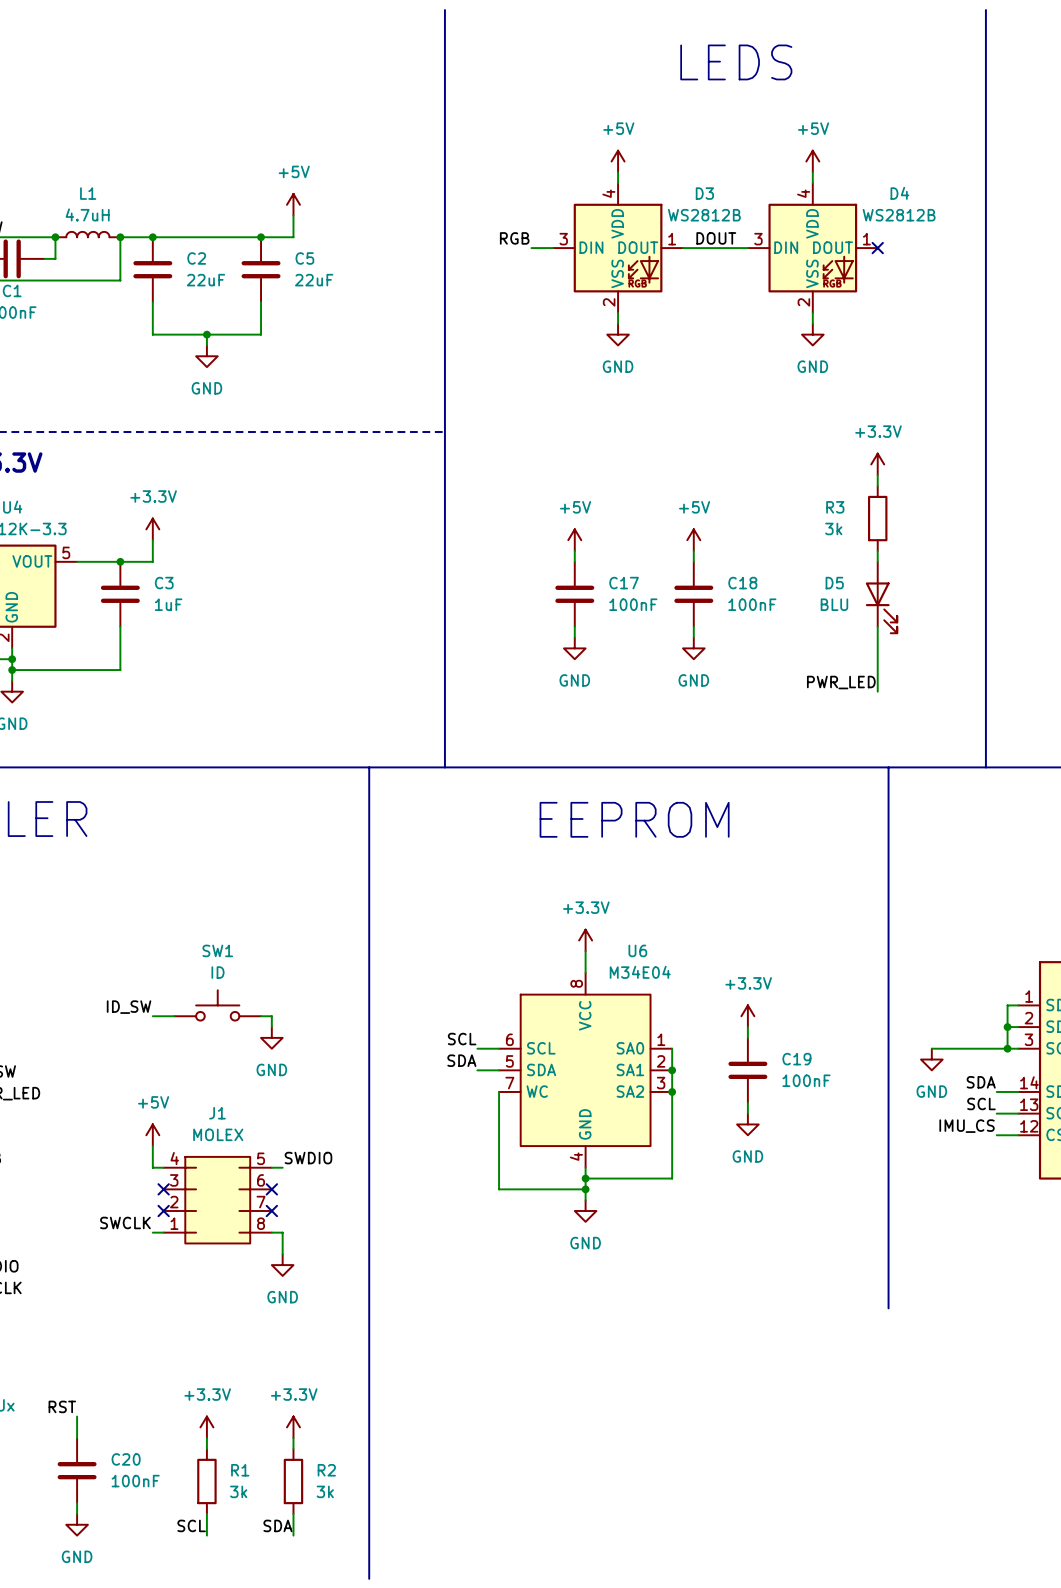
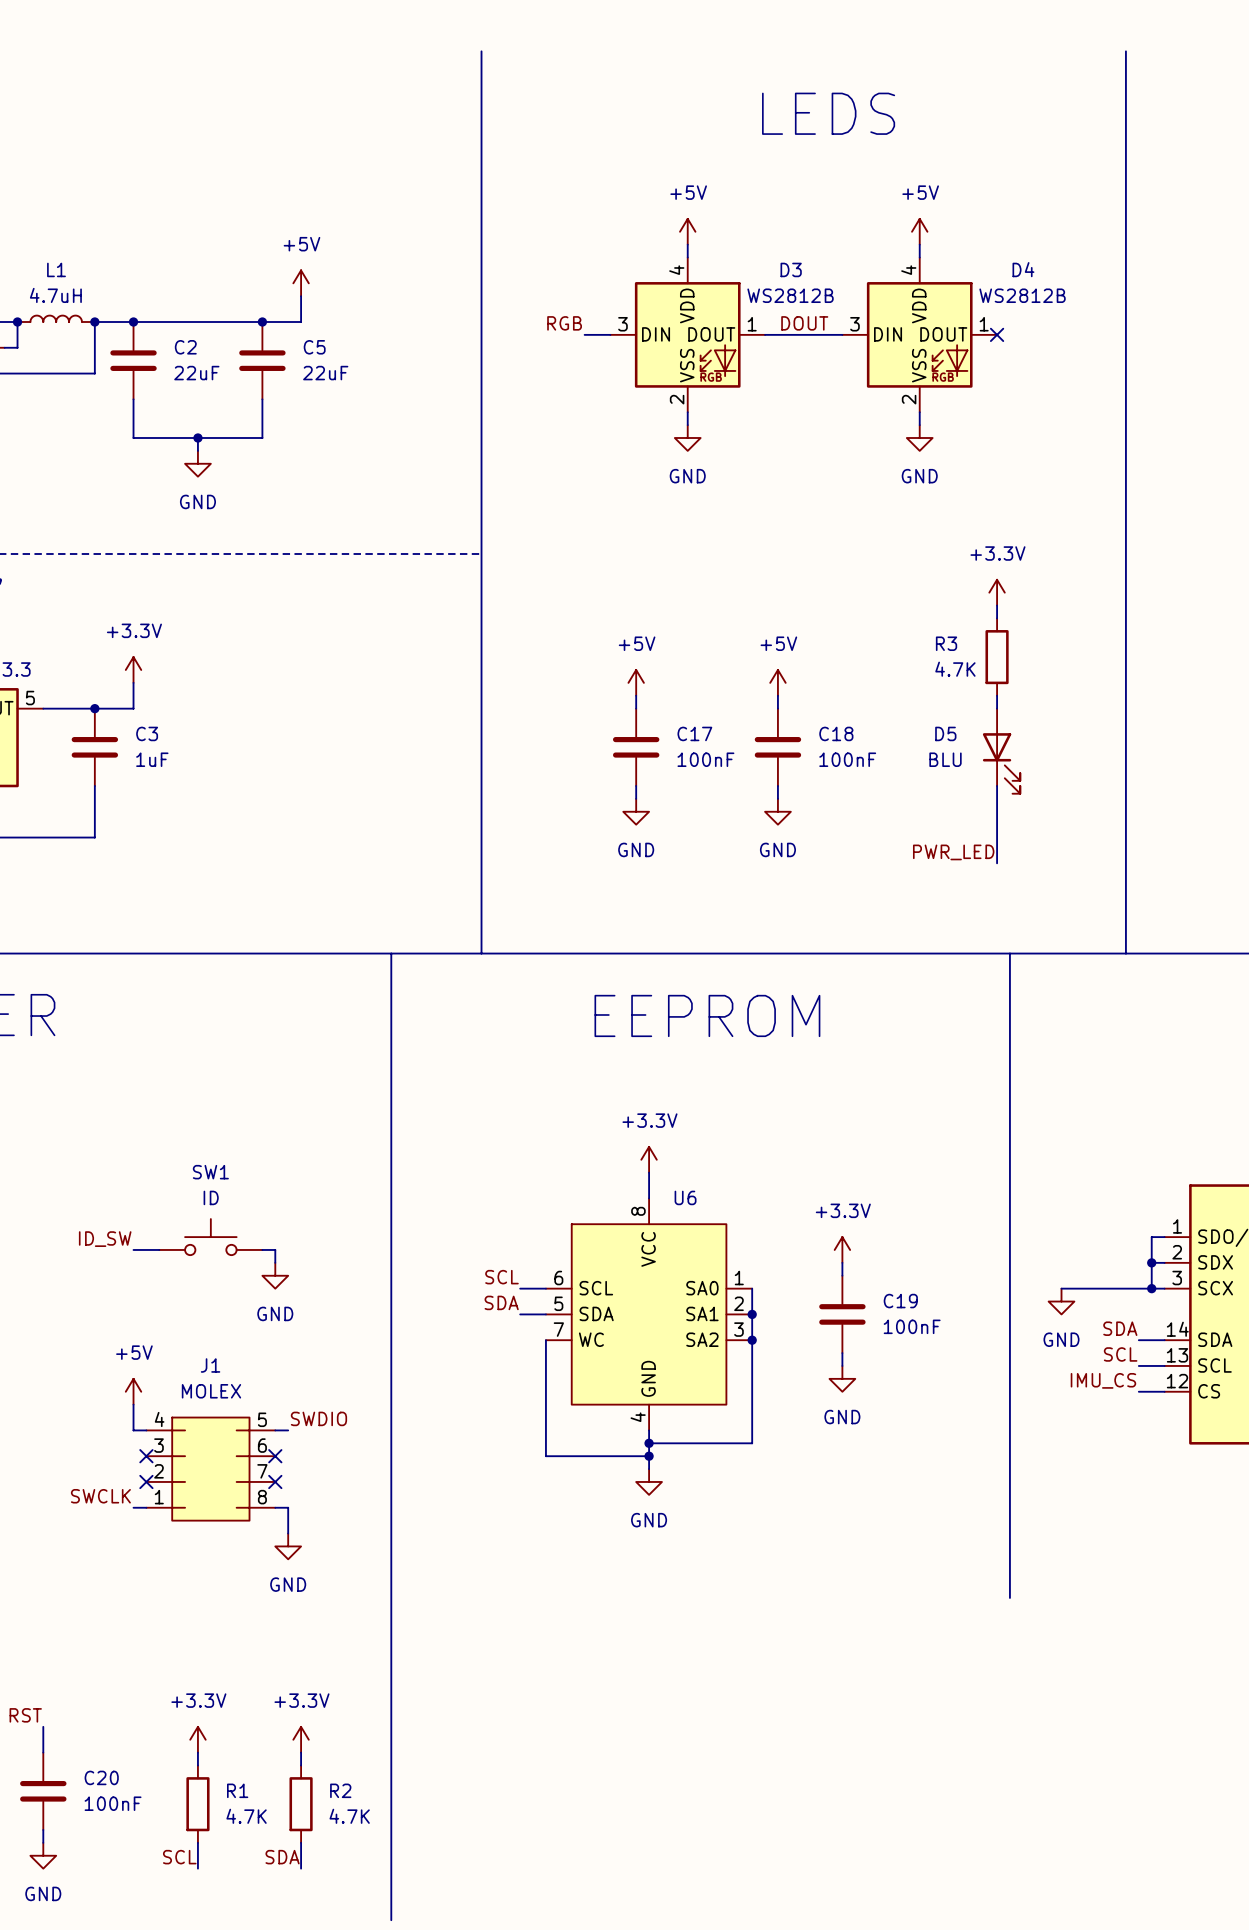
R3 value: 3k (833, 528) -> 4.7K (955, 669)
U6 name position: U6 (637, 950) -> U6 (685, 1197)
U6 value: M34E04 (640, 972) -> none
R1 value: 3k (238, 1491) -> 4.7K (246, 1816)
R2 value: 3k (325, 1491) -> 4.7K (349, 1816)

